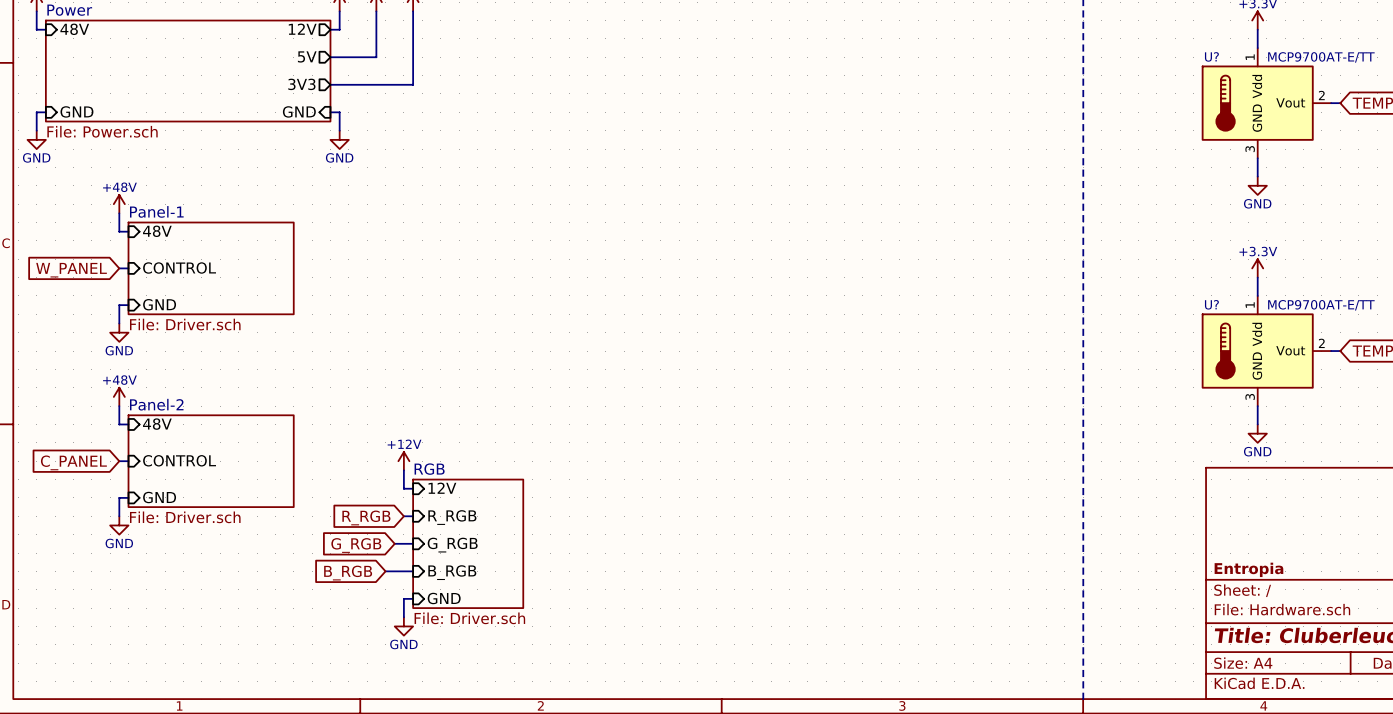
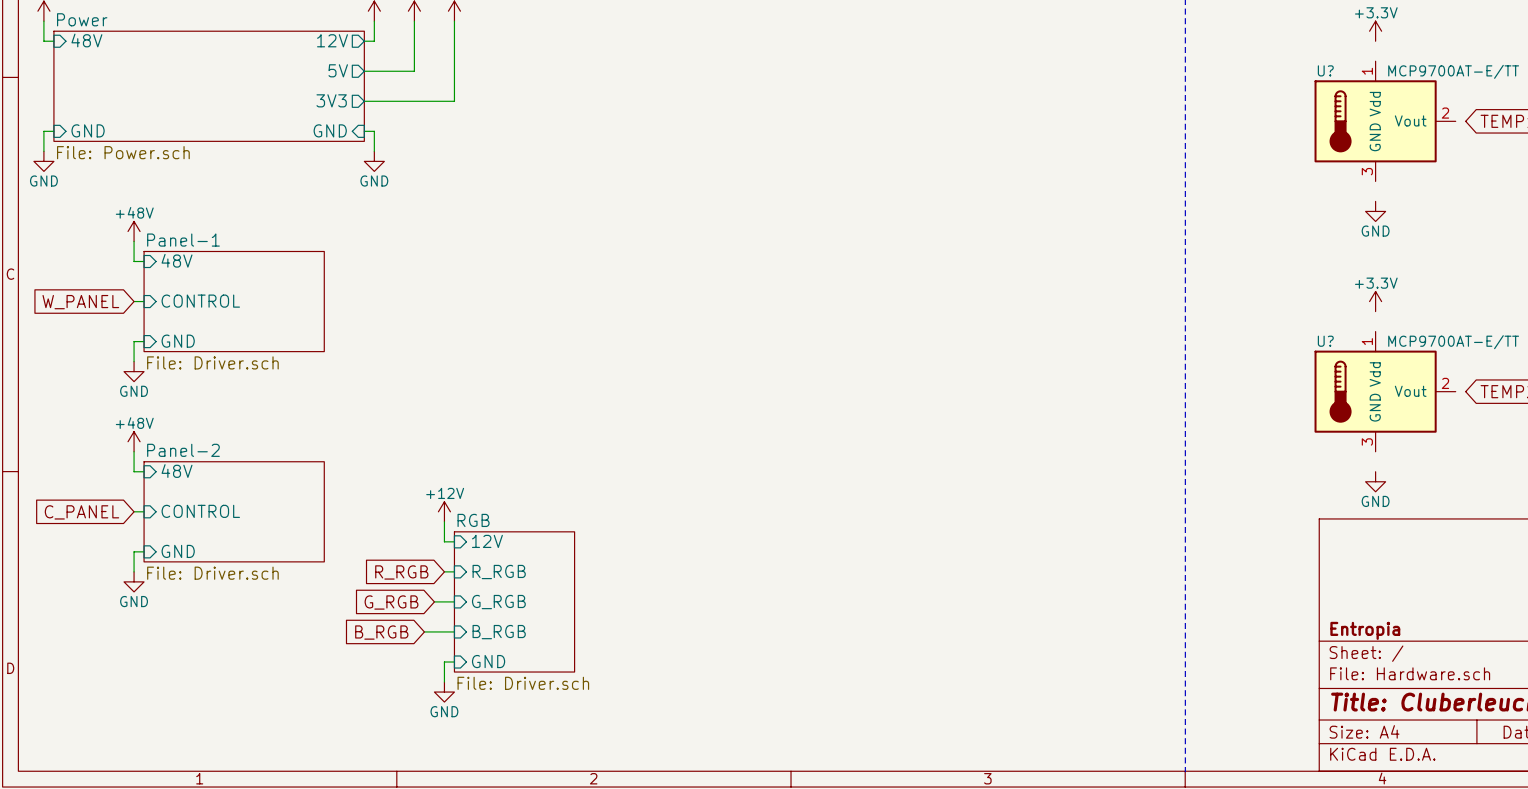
wire: (1257, 29) (1257, 48) -> none
wire: (1331, 103) (1340, 103) -> none
wire: (1257, 158) (1257, 176) -> none
wire: (1257, 277) (1257, 295) -> none
wire: (1331, 351) (1340, 351) -> none
wire: (1257, 406) (1257, 424) -> none

